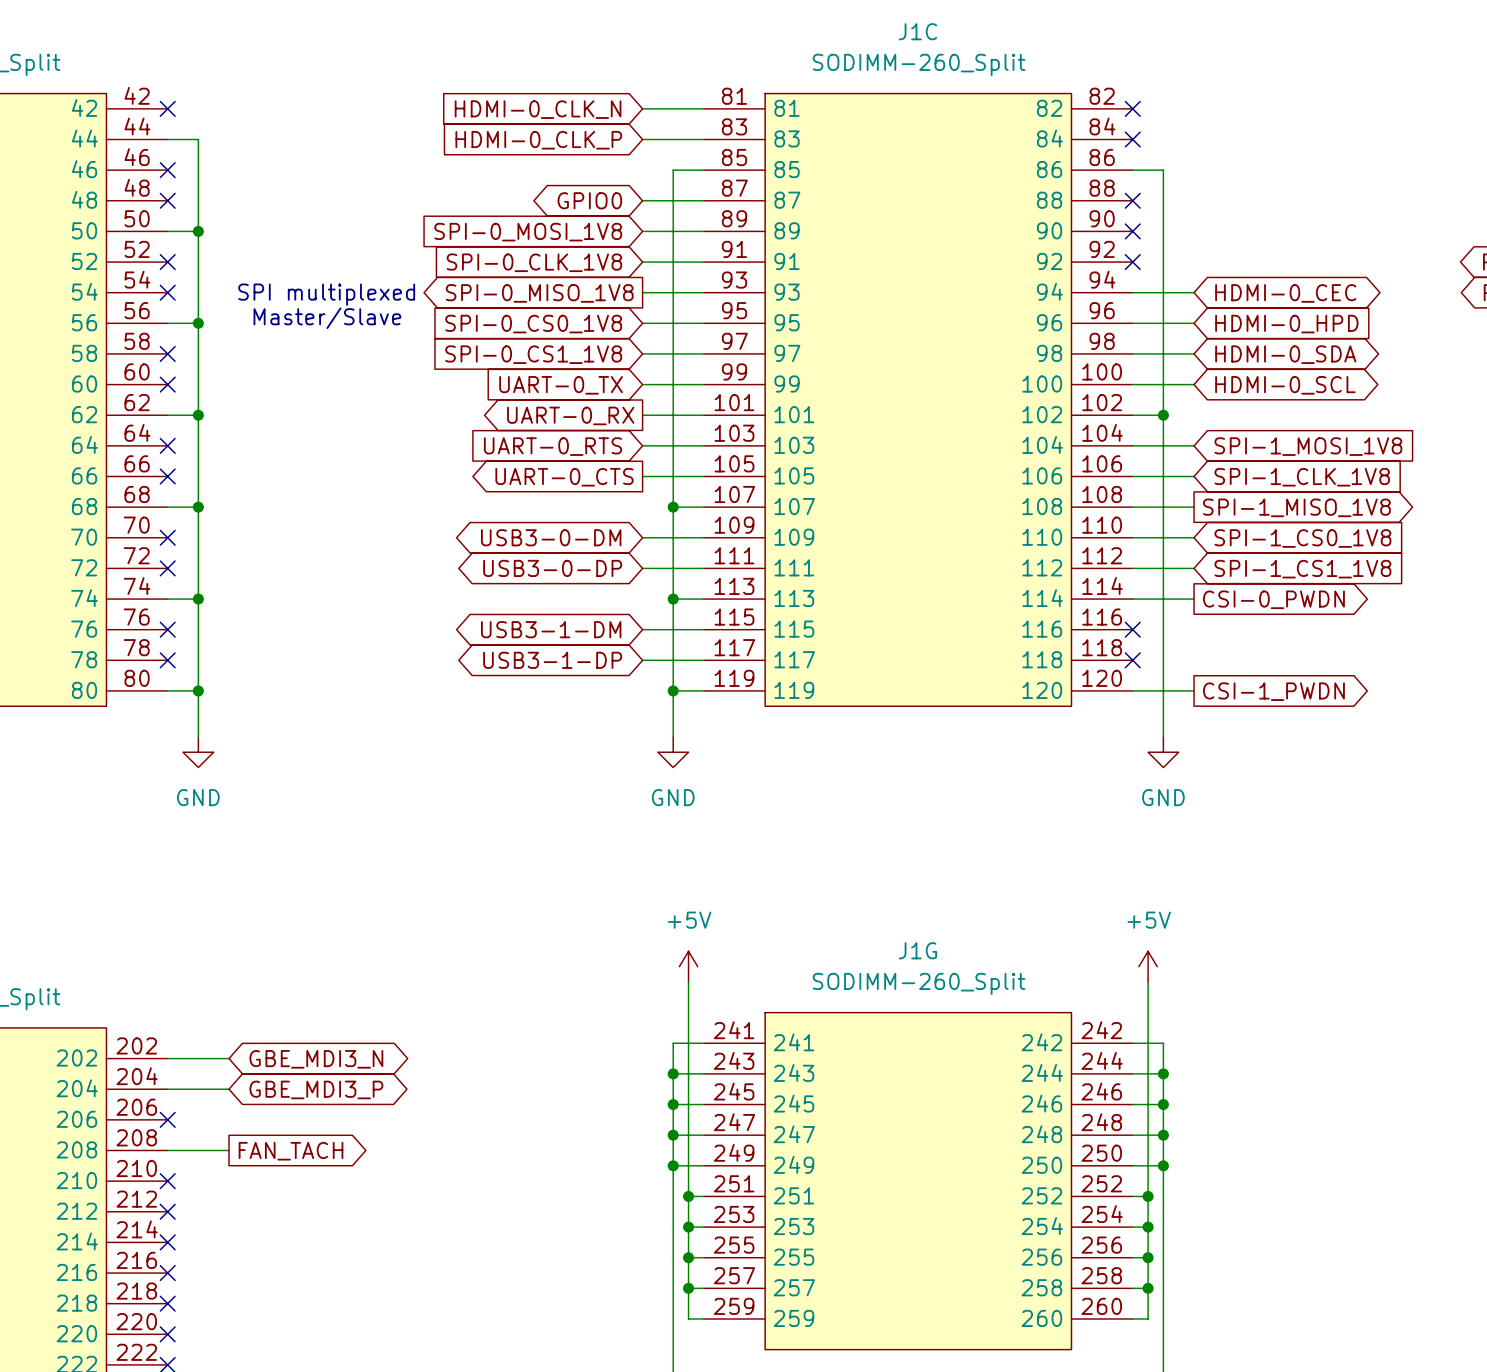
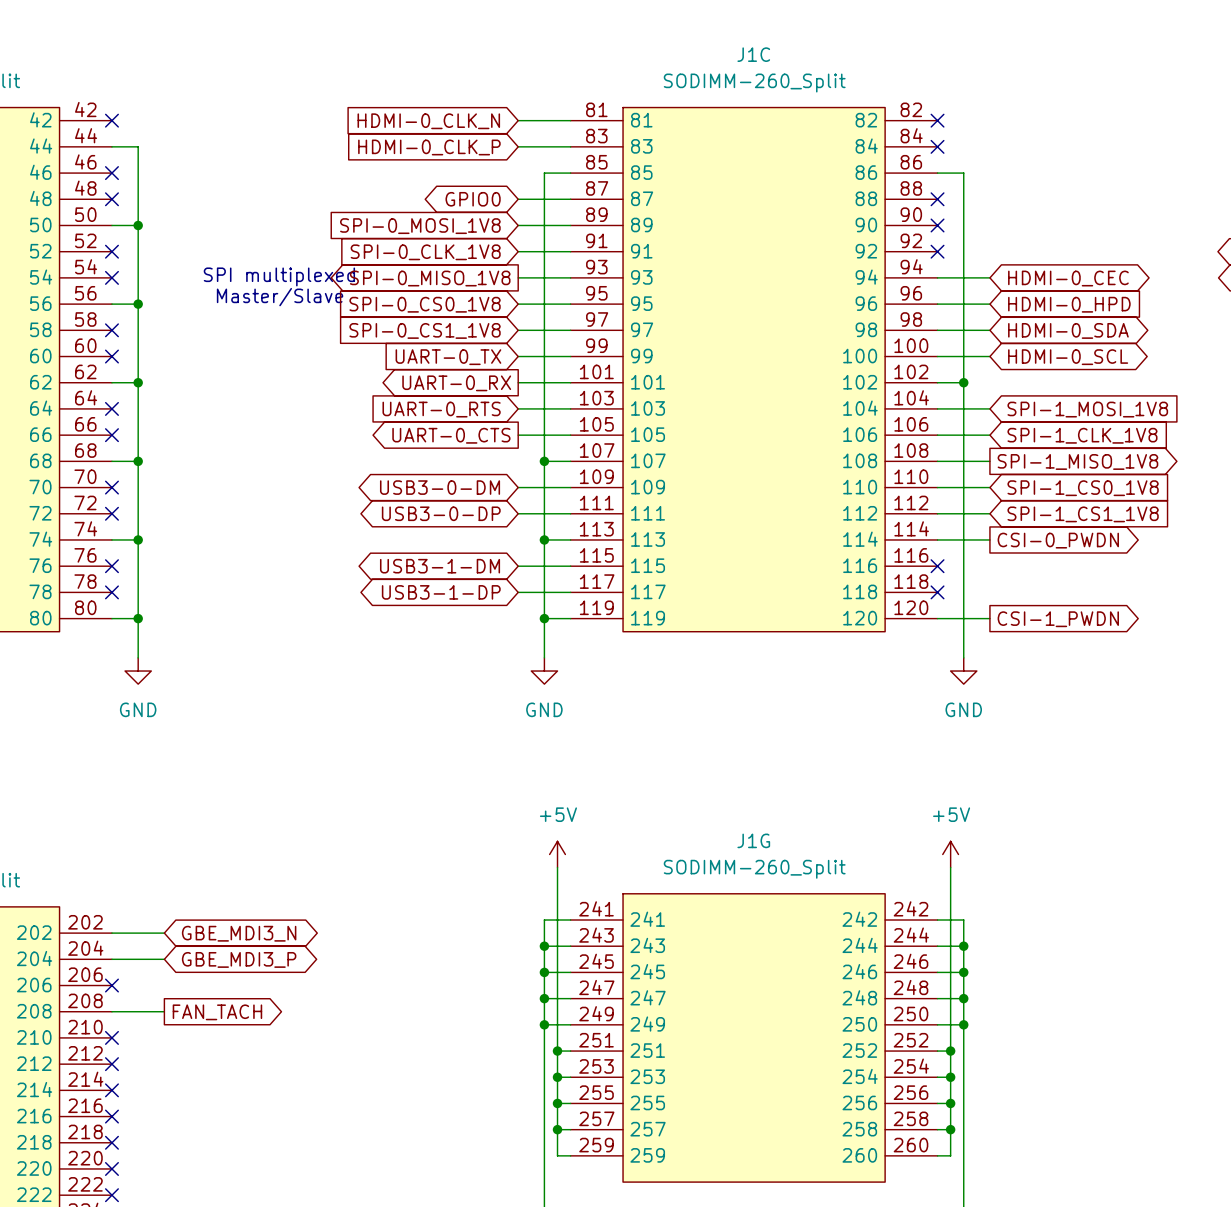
text position: SPI multiplexed (326, 294) -> SPI multiplexed (279, 276)
text position: Master/Slave (327, 318) -> Master/Slave (280, 297)

